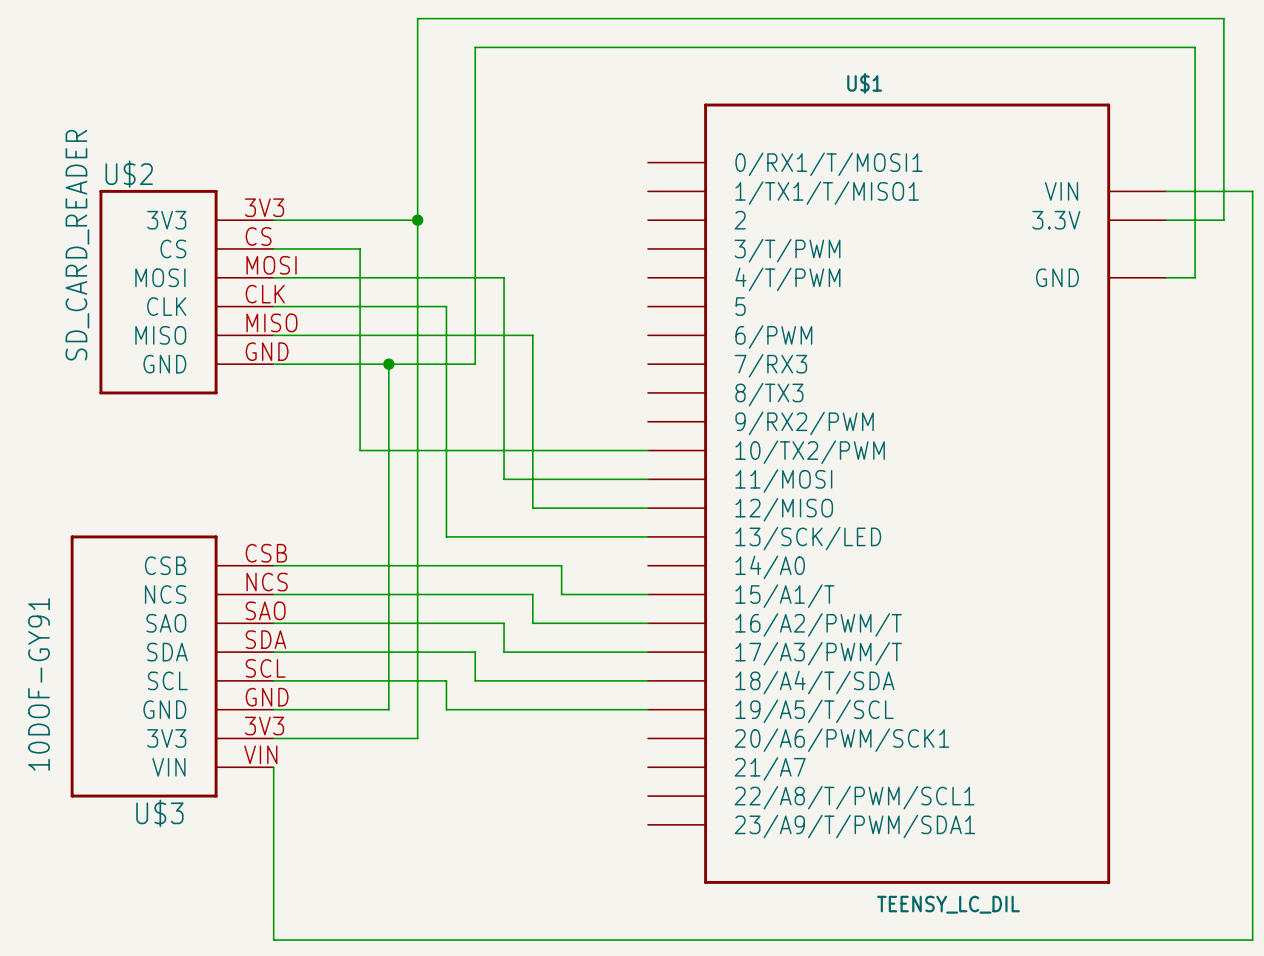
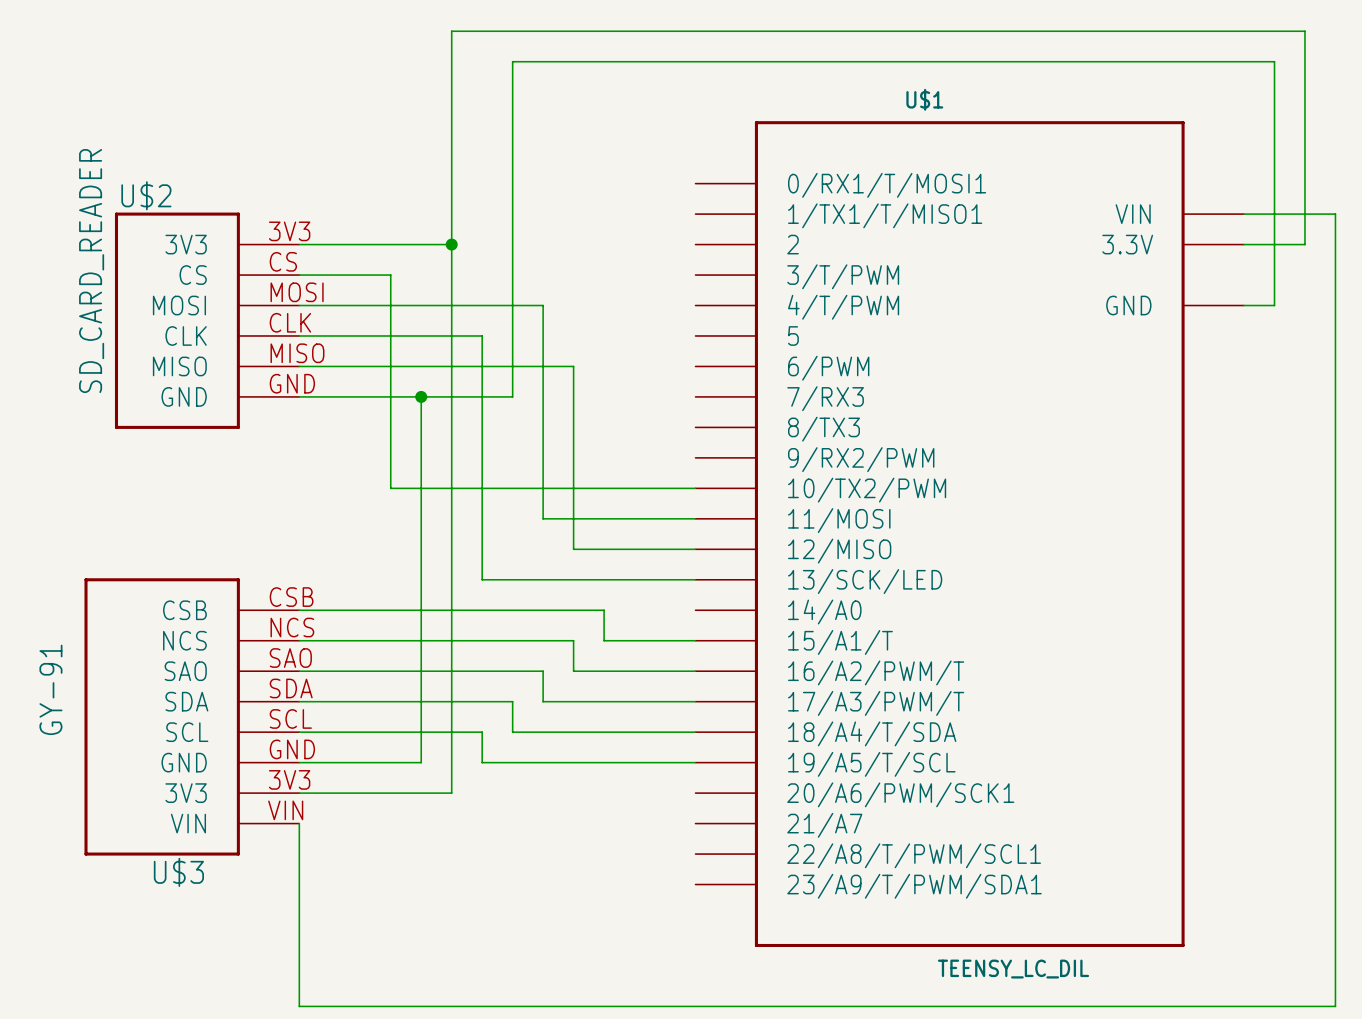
U$3 value: 10DOF-GY91 (39, 684) -> GY-91 (50, 689)

